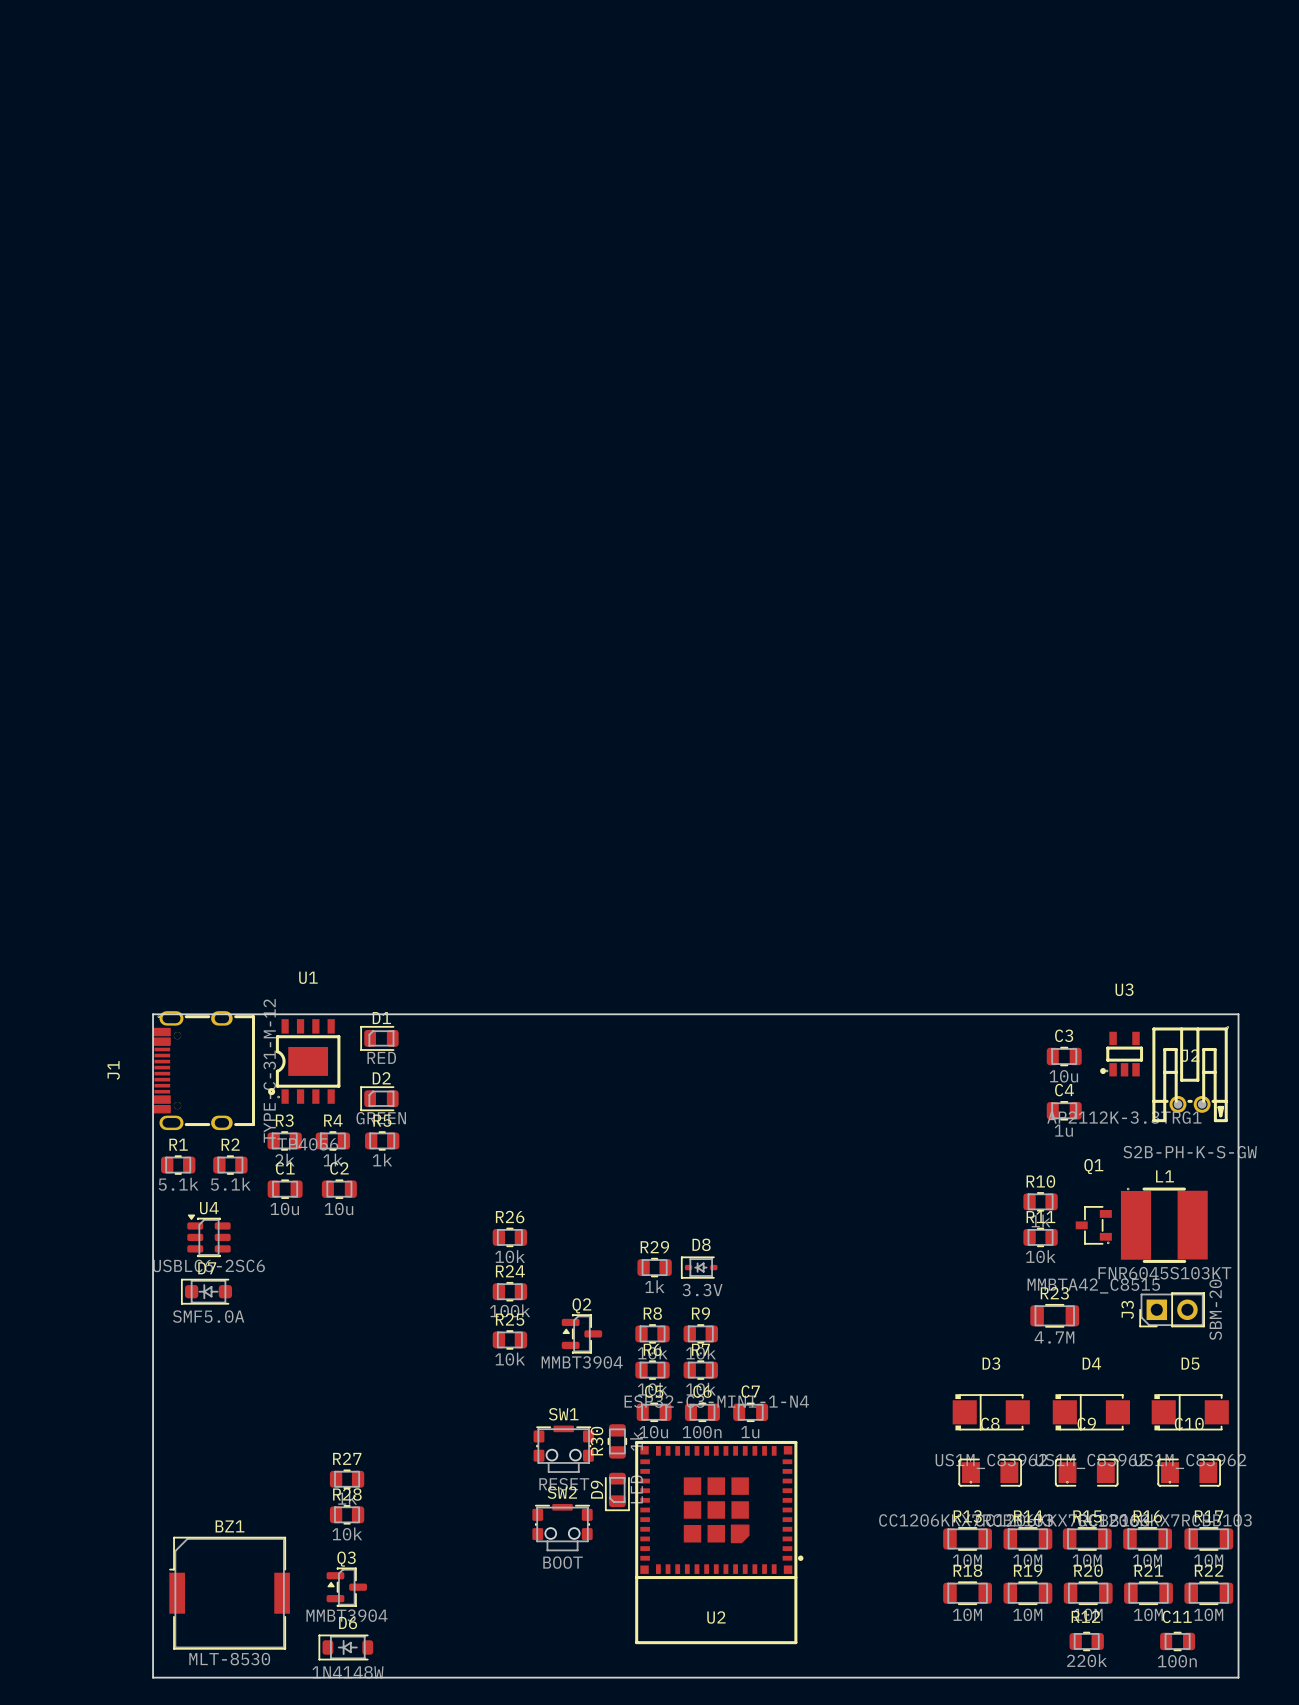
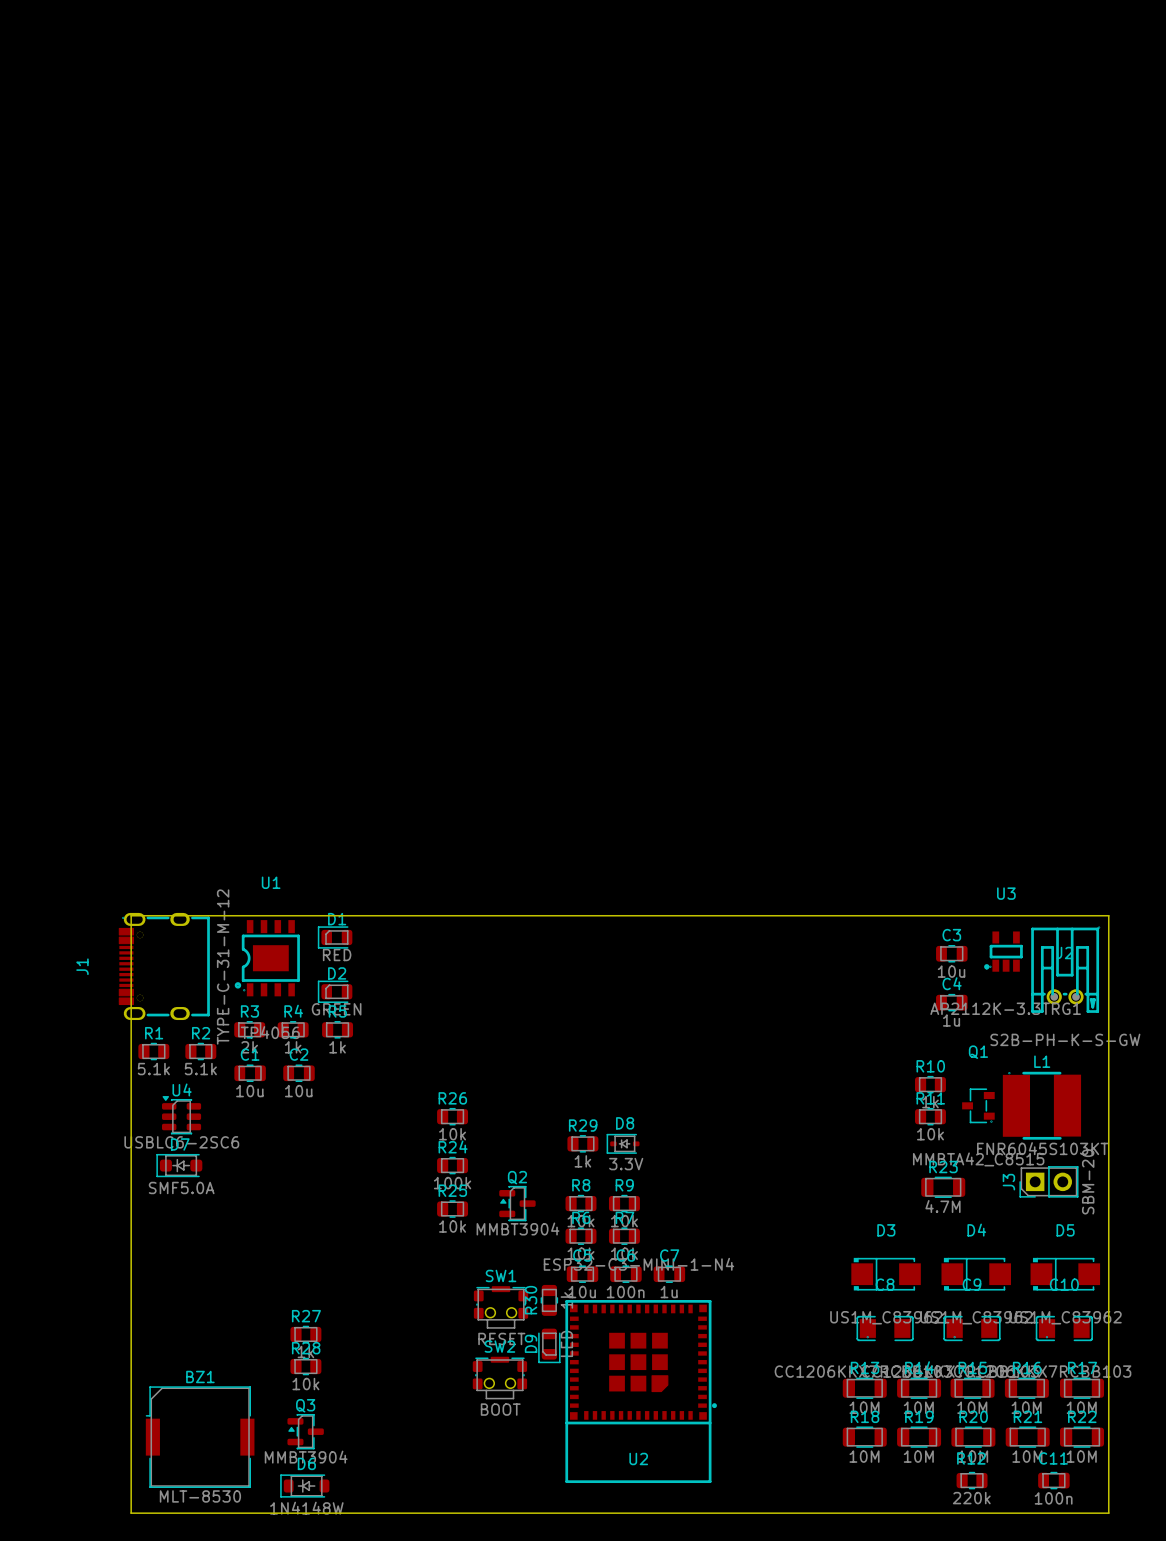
J1 footprint: [153, 1011, 256, 1131] -> [118, 912, 210, 1021]

